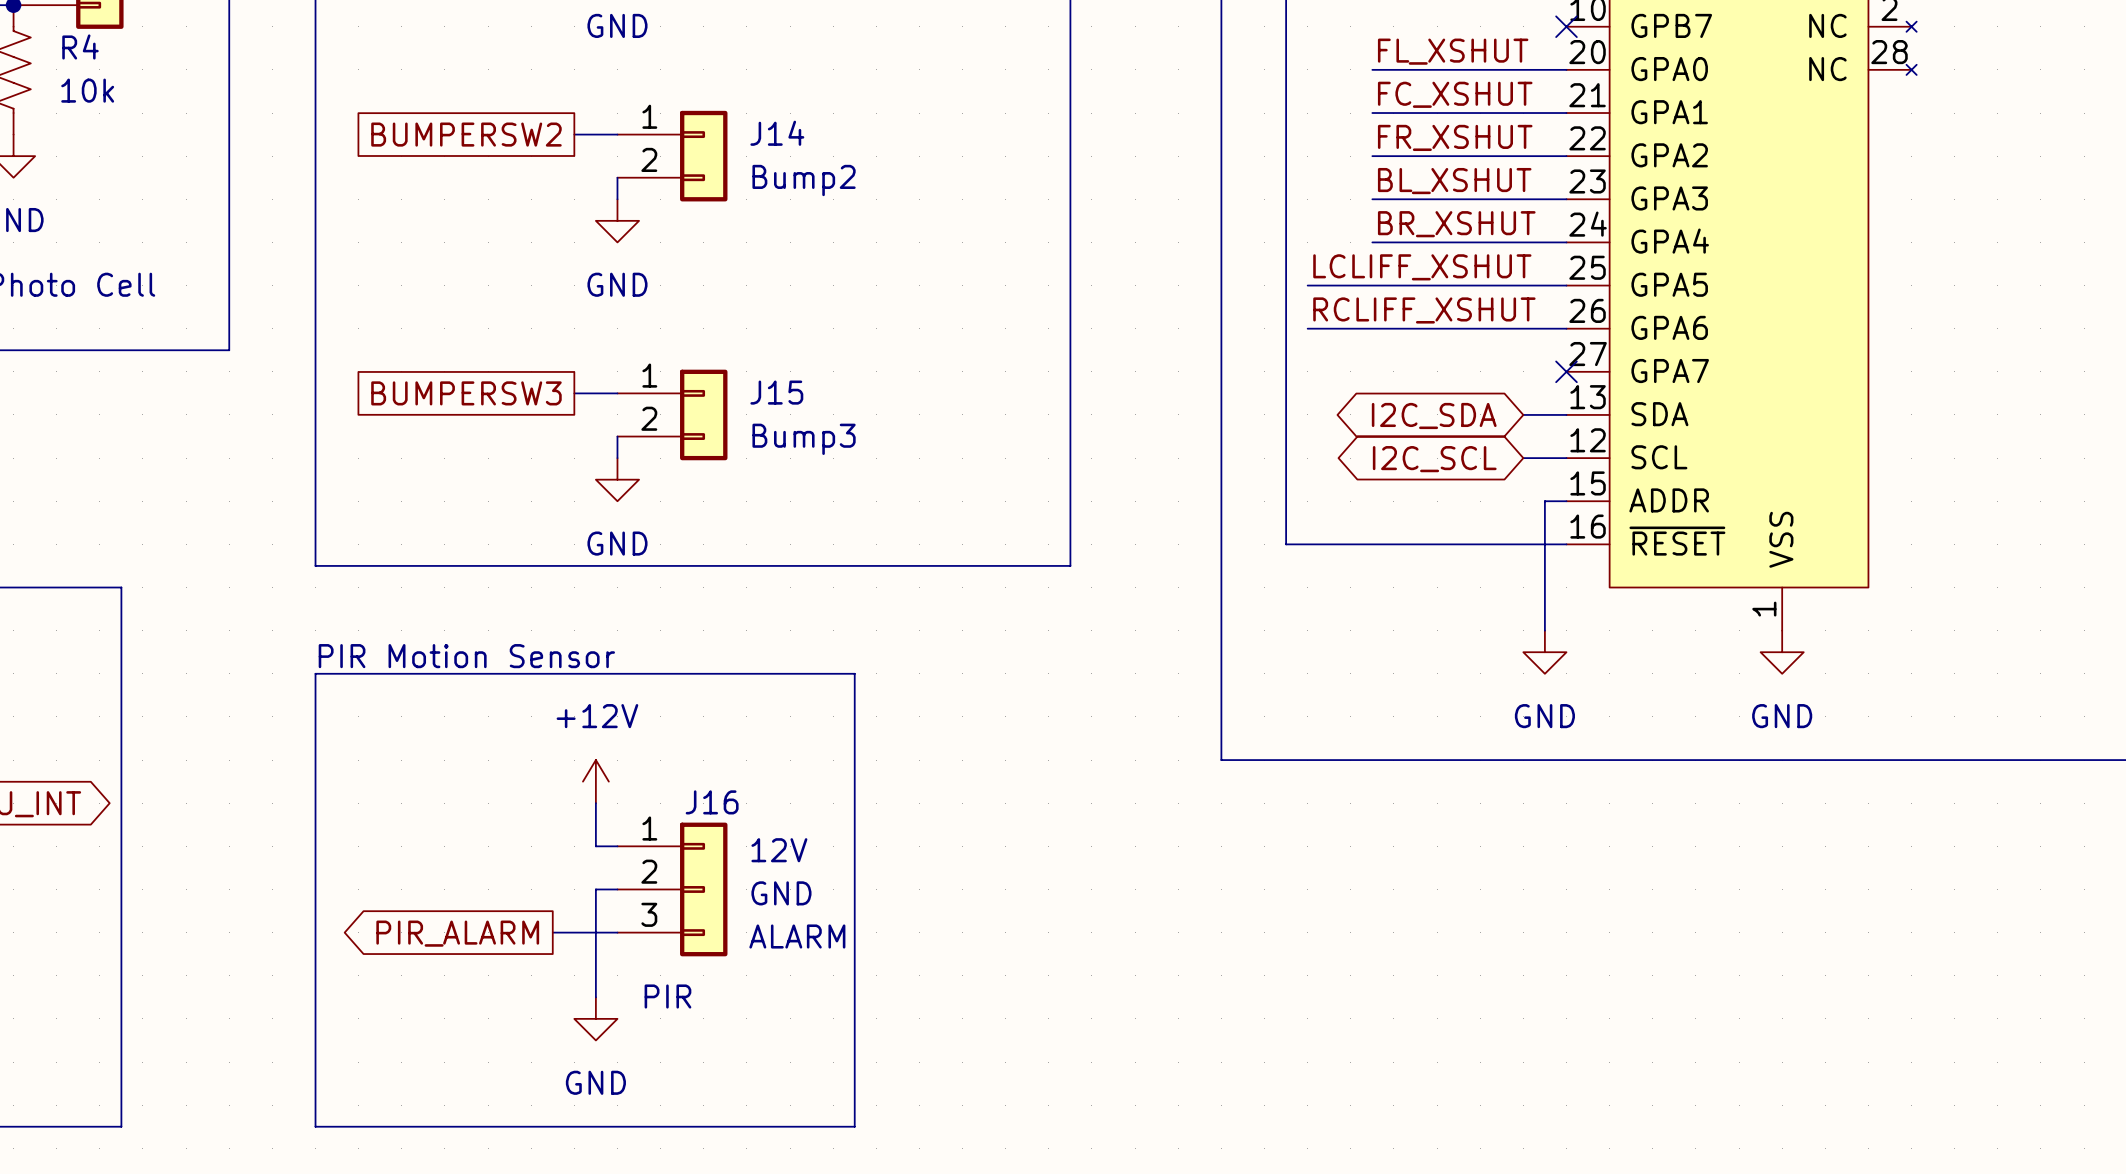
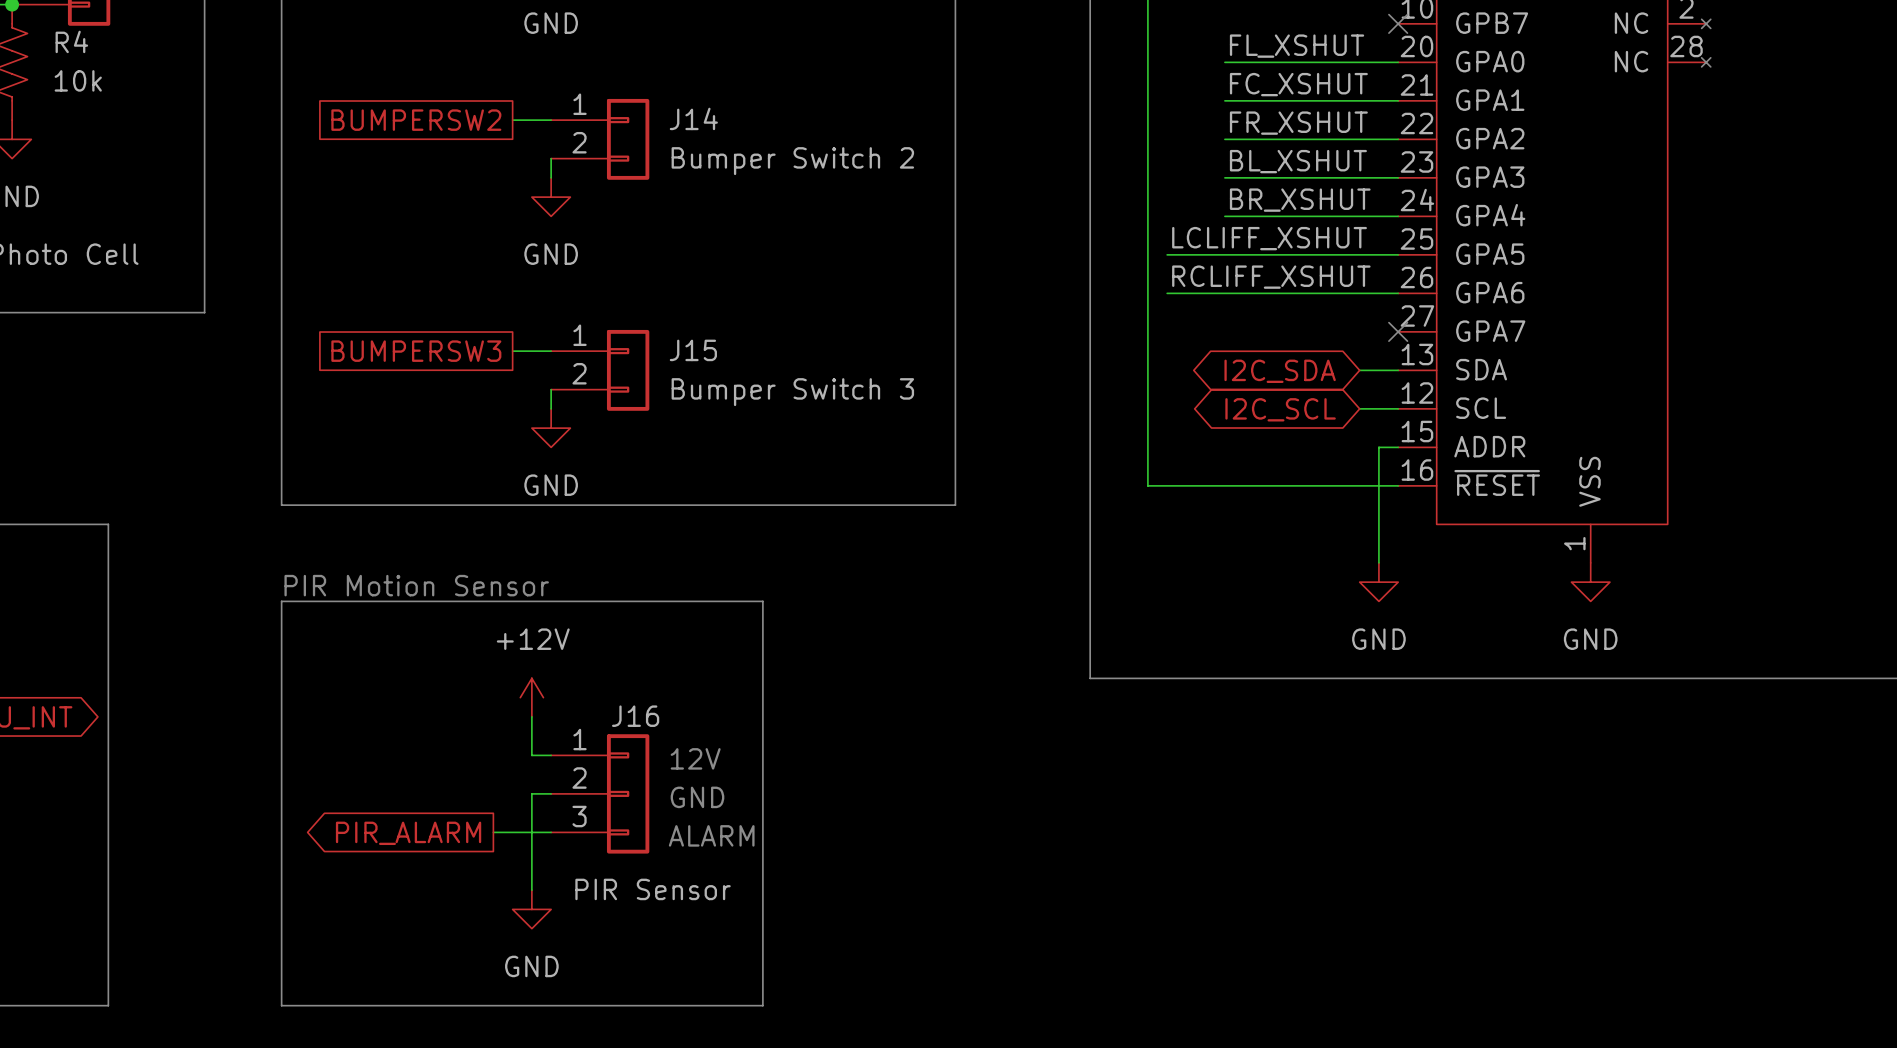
J14 value: Bump2 (804, 180) -> Bumper Switch 2 (792, 161)
J15 value: Bump3 (804, 439) -> Bumper Switch 3 (792, 392)
J16 value: PIR (667, 996) -> PIR Sensor (653, 889)

